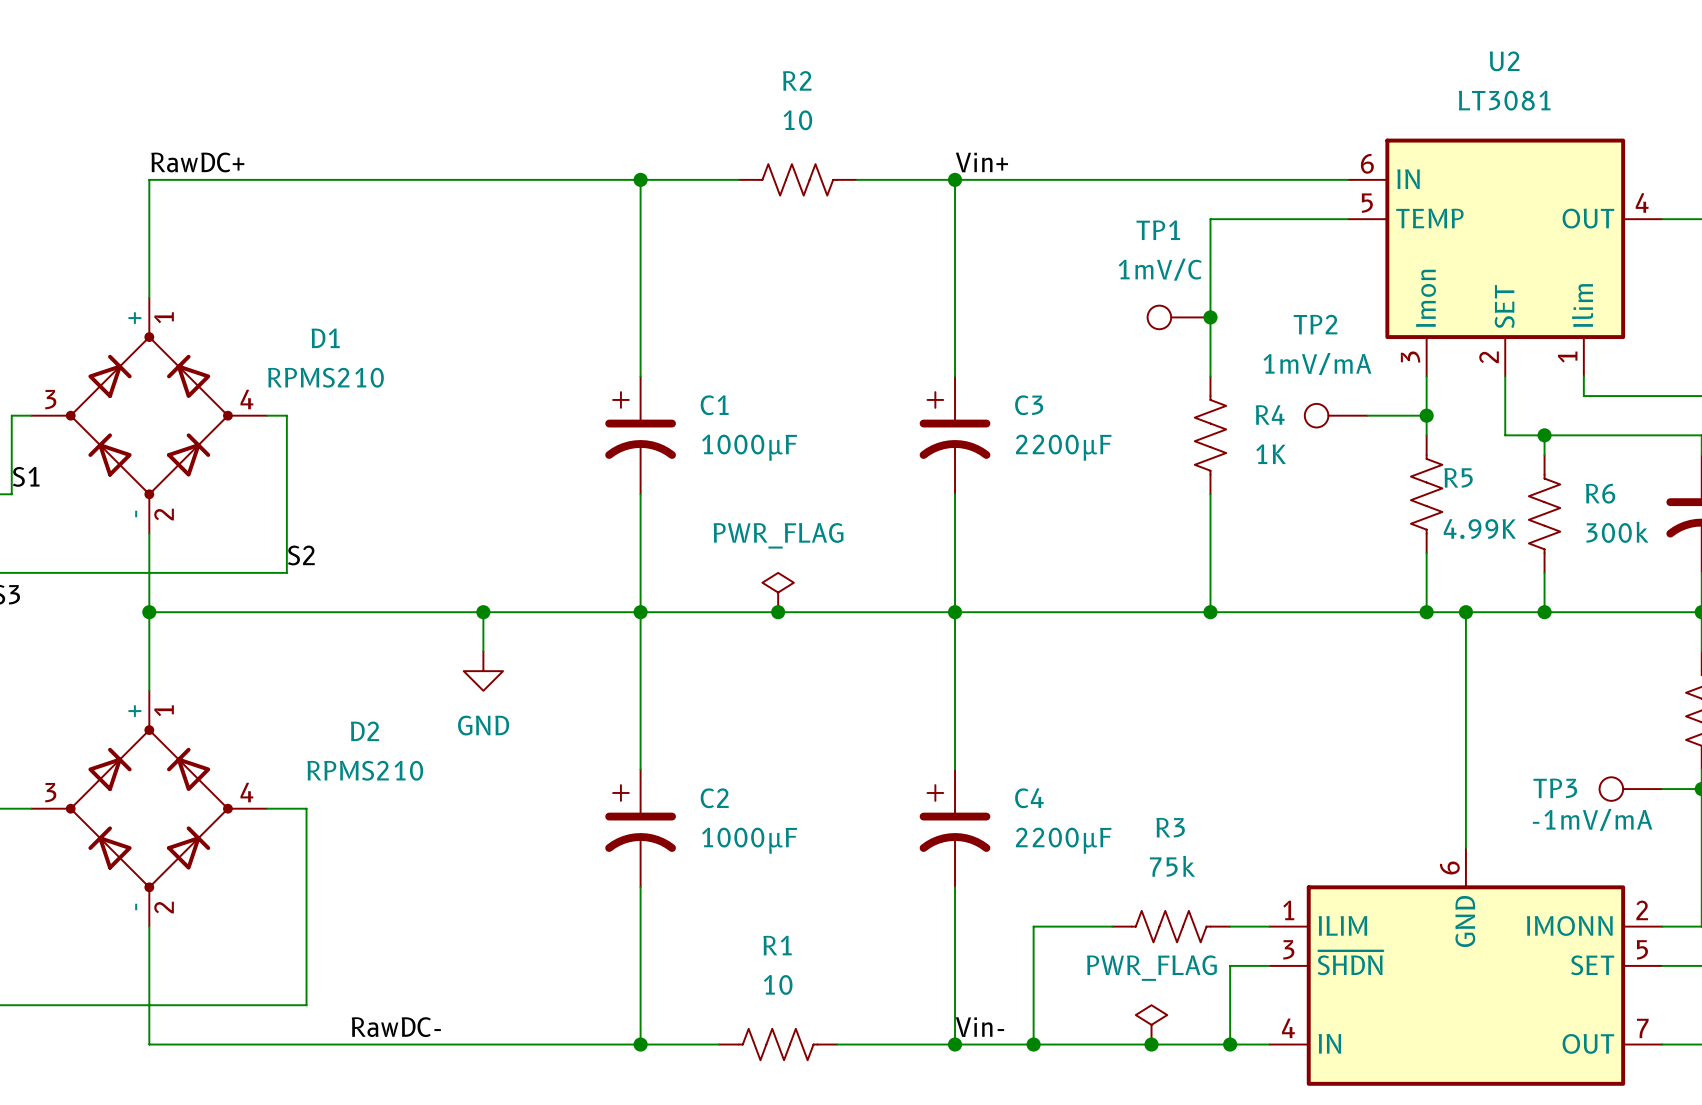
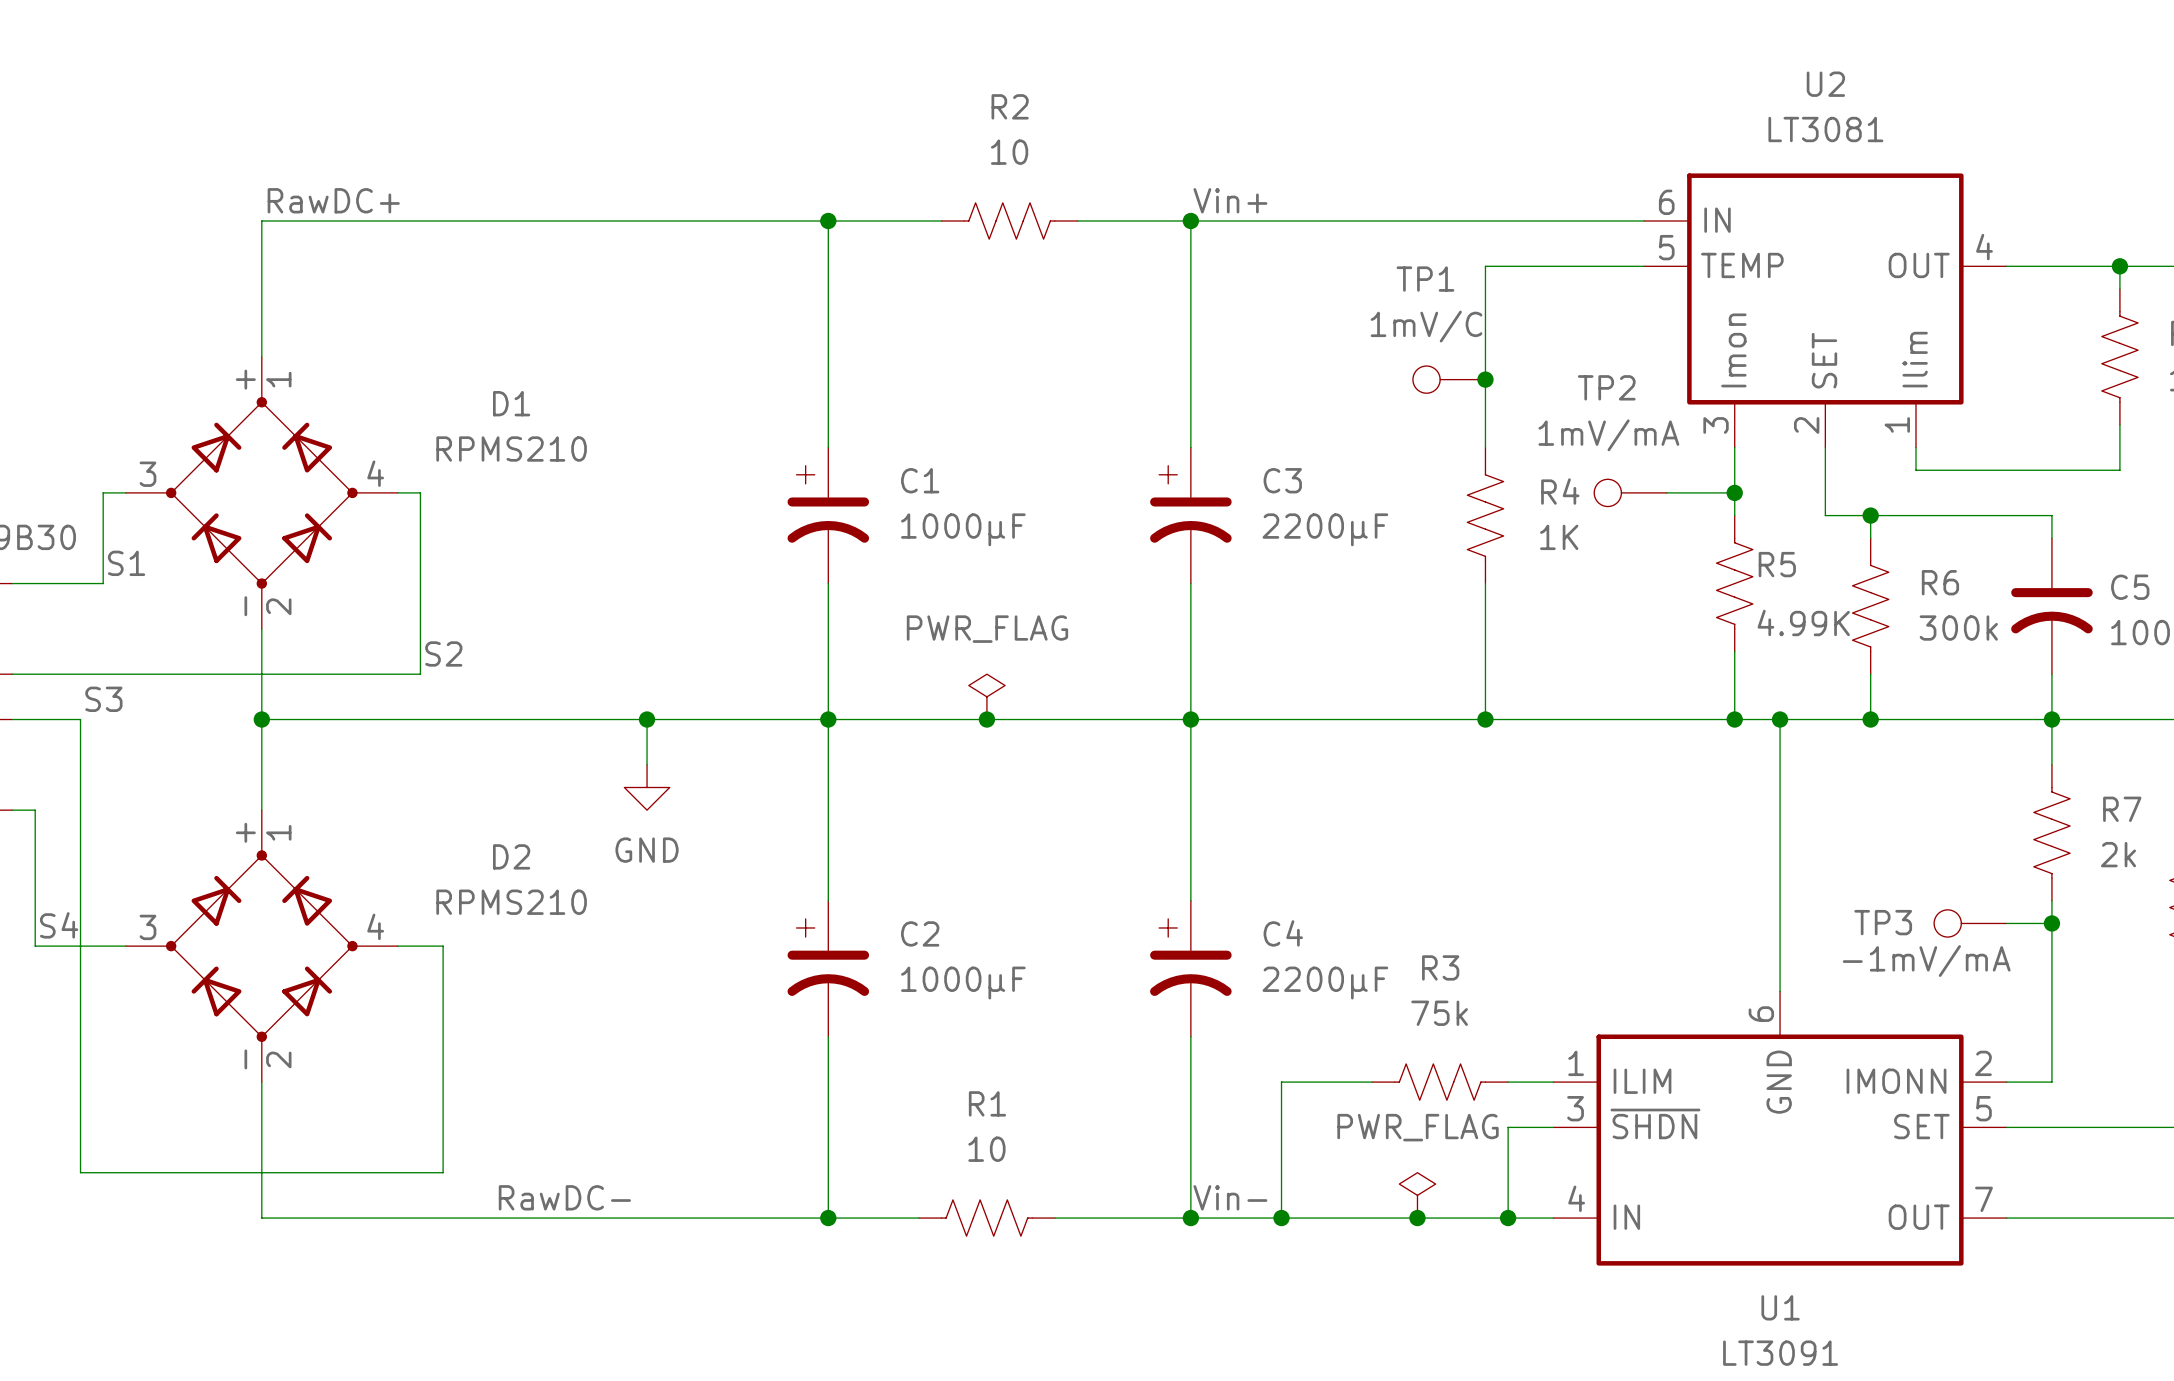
D1 name position: D1 (325, 338) -> D1 (511, 403)
D1 value position: RPMS210 (325, 377) -> RPMS210 (511, 449)

